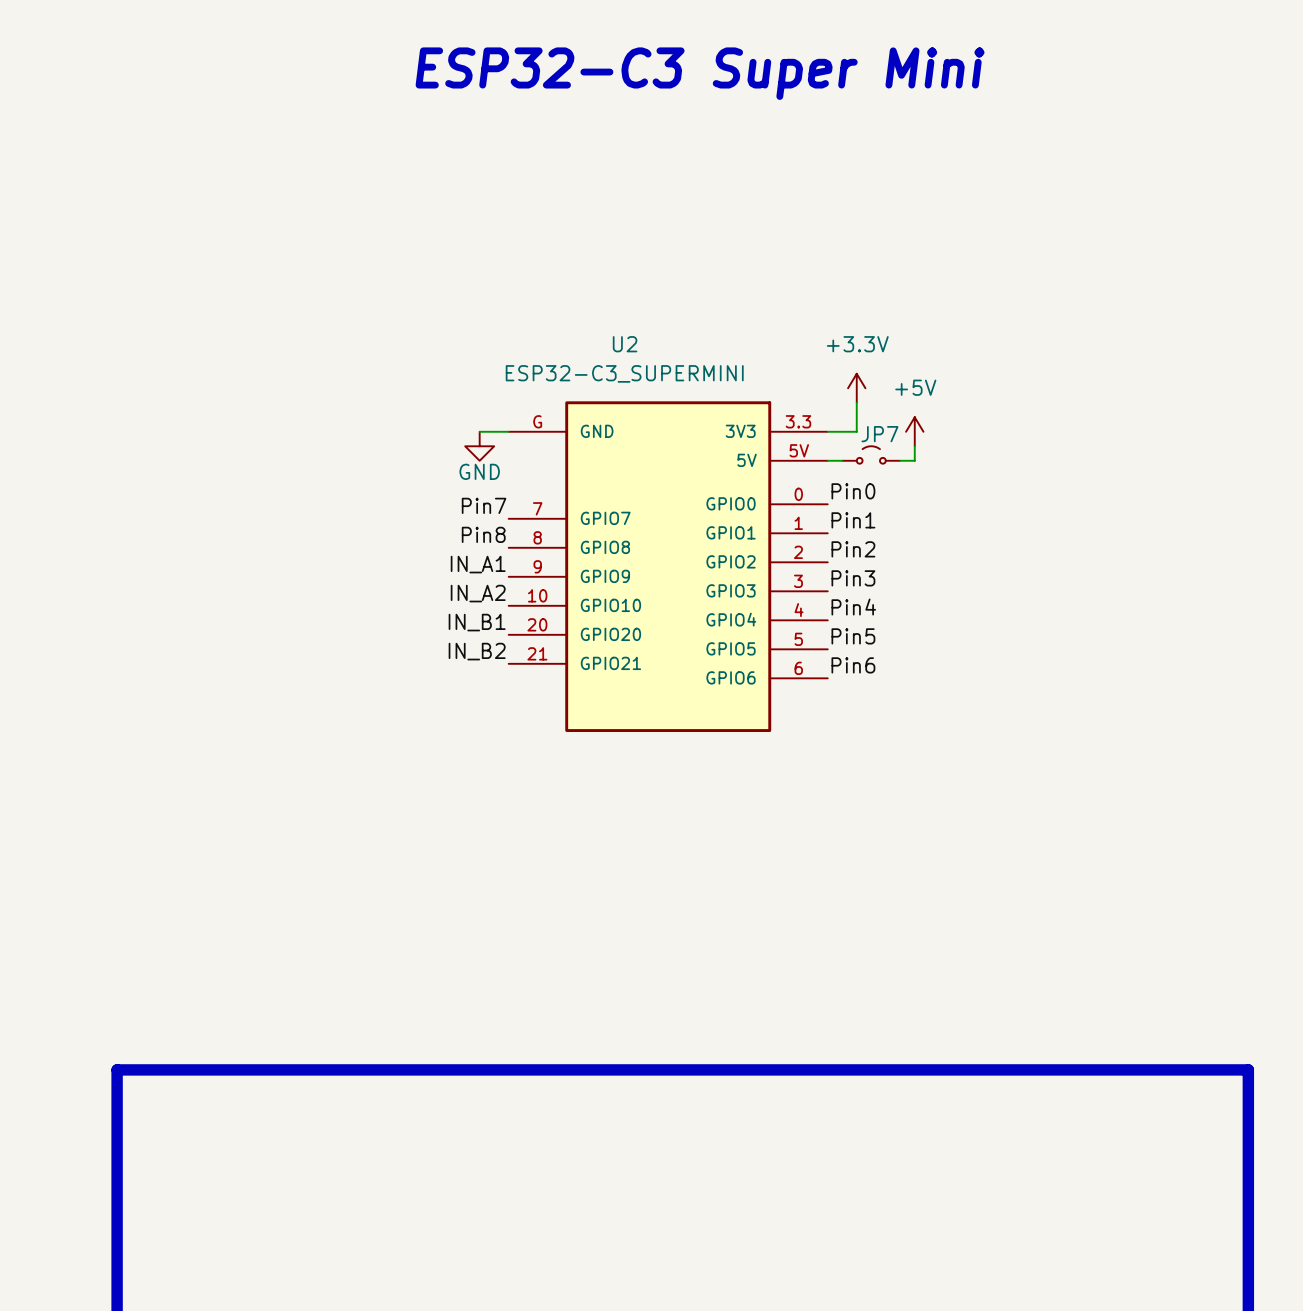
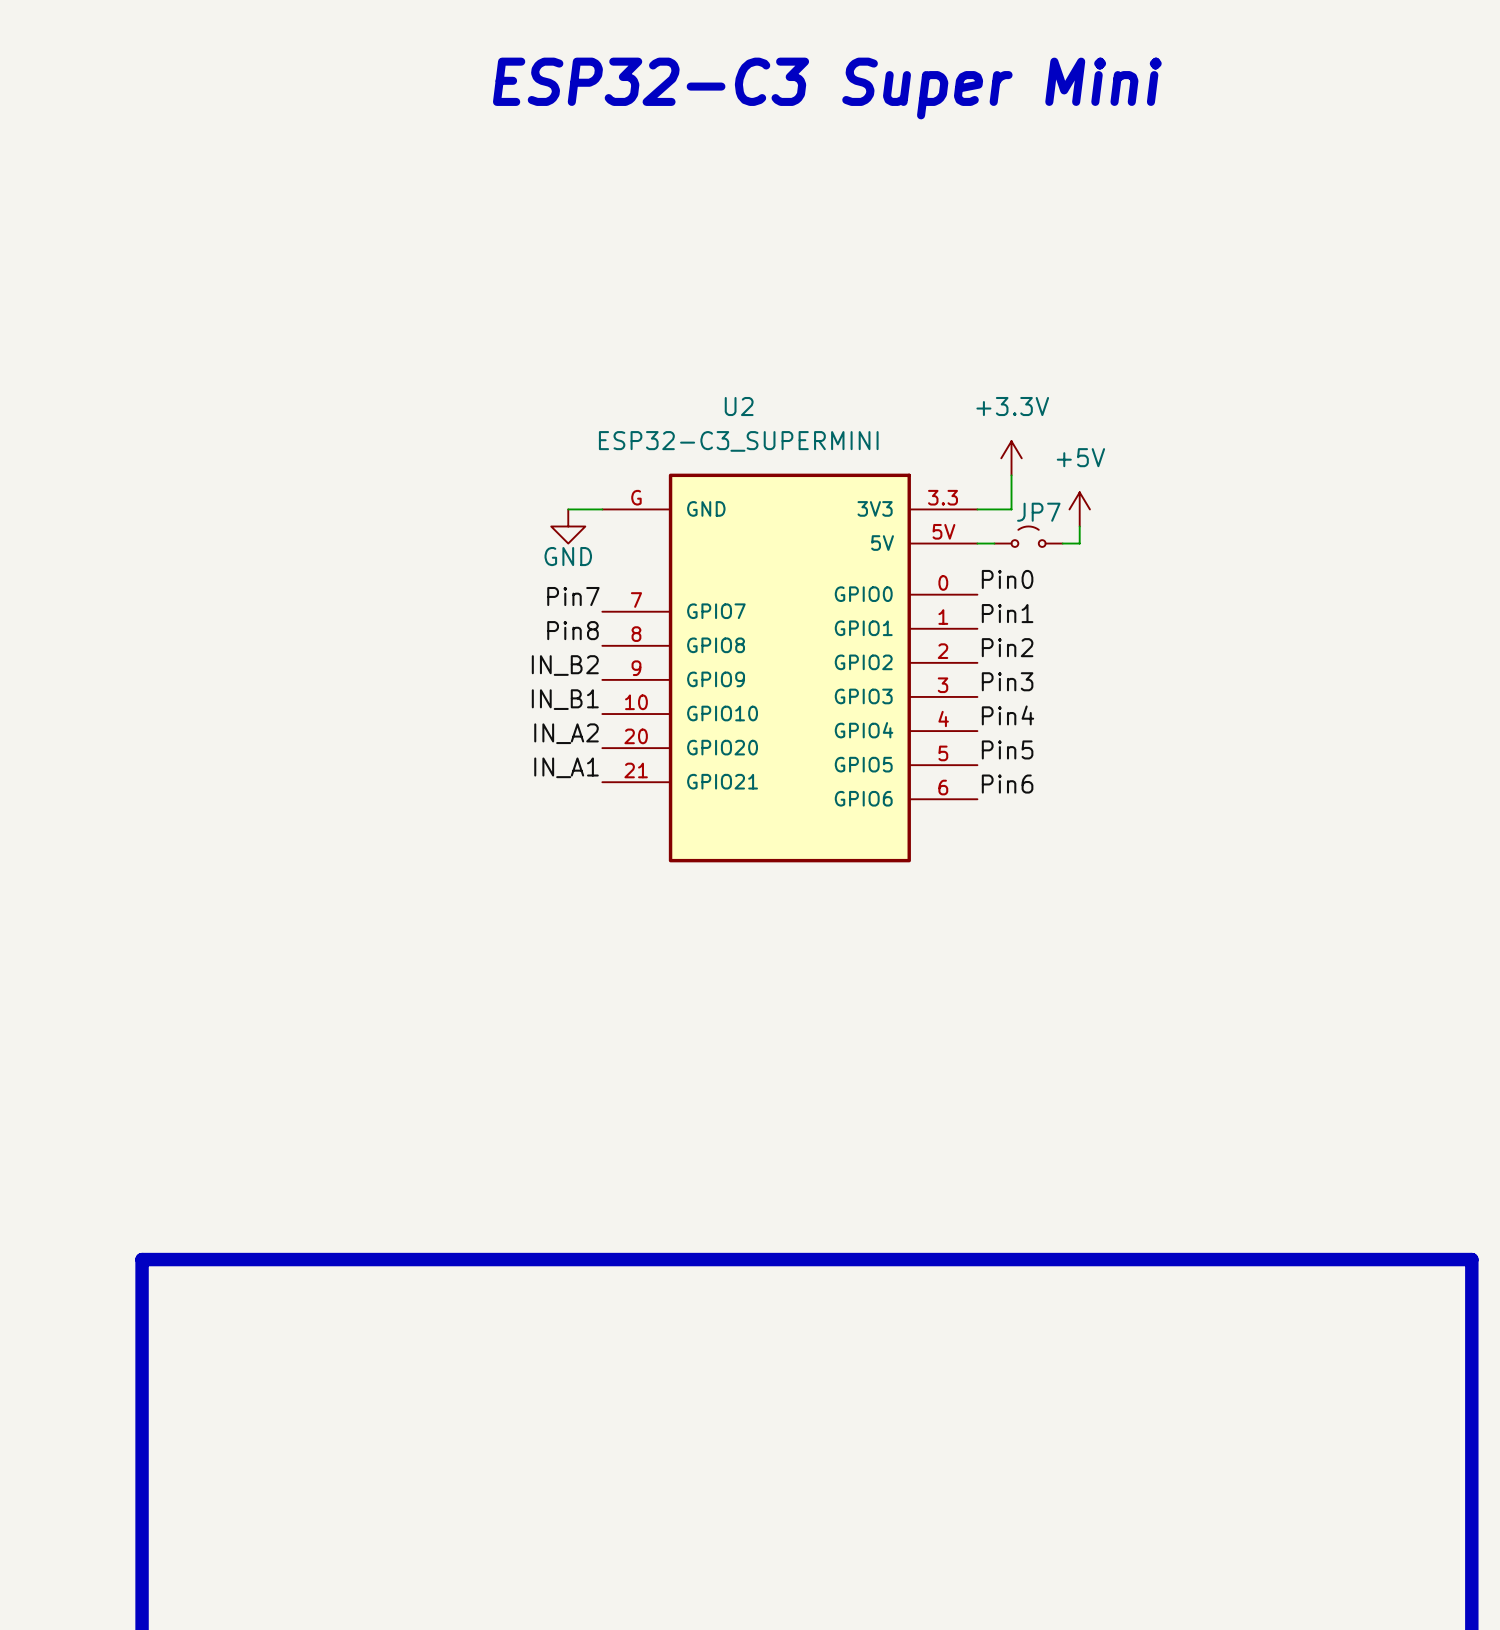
label: IN_A1 (478, 564) -> IN_B2 (565, 665)
label: IN_A2 (478, 593) -> IN_B1 (565, 699)
label: IN_B1 (477, 622) -> IN_A2 (566, 733)
label: IN_B2 (477, 651) -> IN_A1 (566, 767)

